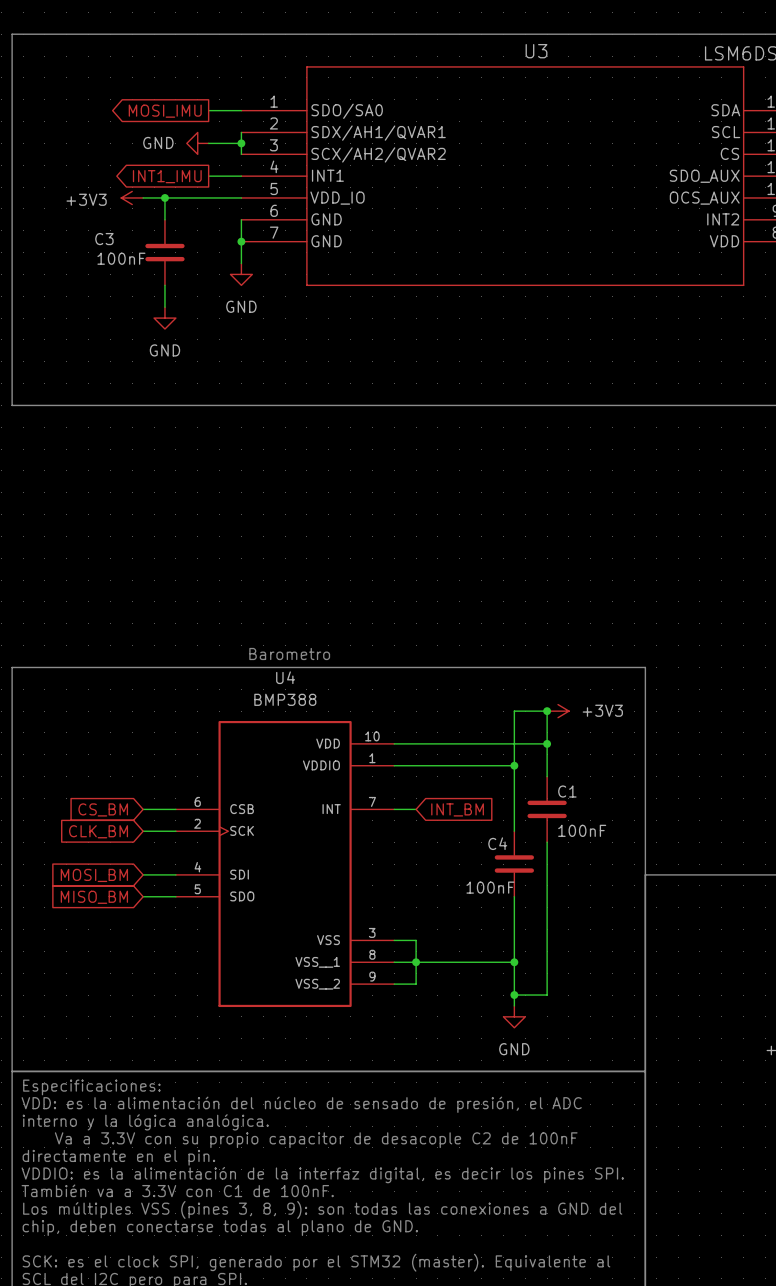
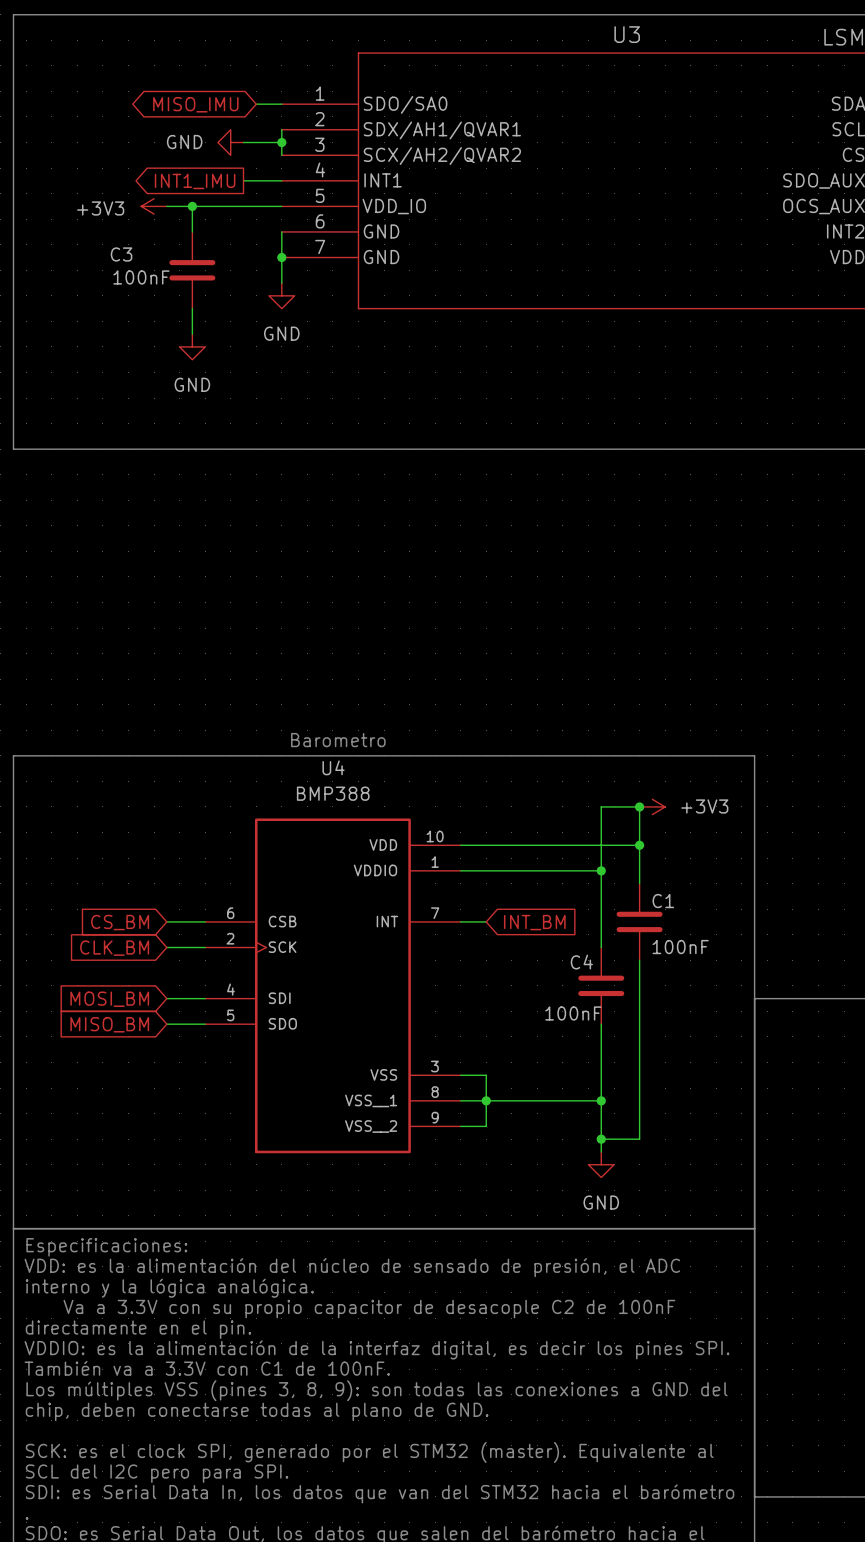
wire: (208, 110) (219, 110) -> none
global label shape: output (165, 111) -> bidirectional (195, 104)
global label: MOSI_IMU (165, 111) -> MISO_IMU (195, 104)

